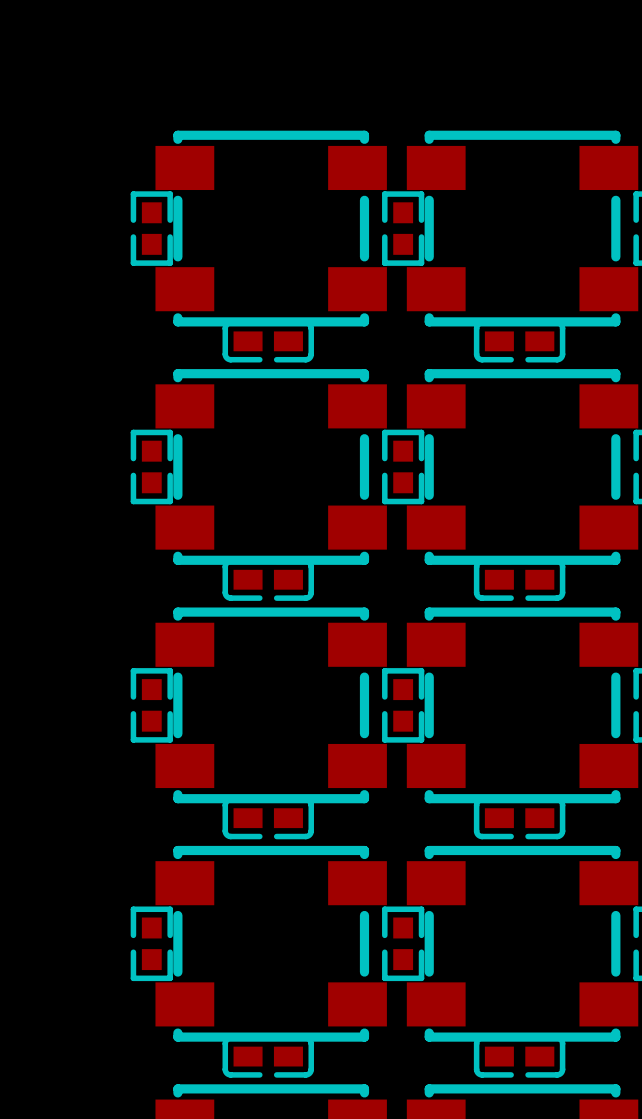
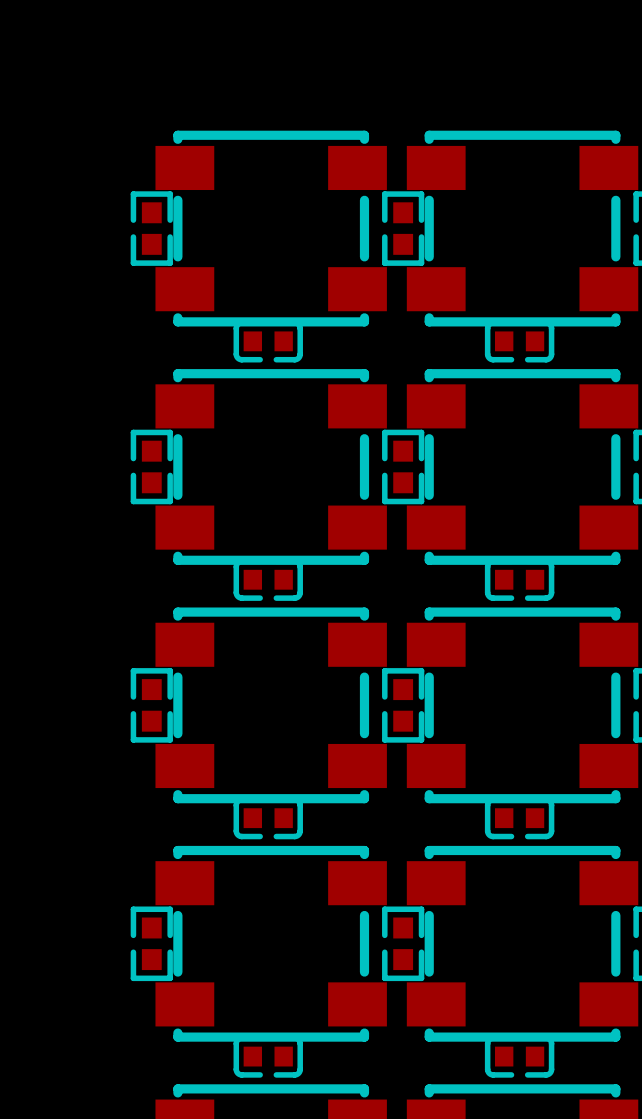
part footprint: [222, 320, 314, 363] -> [233, 320, 303, 363]
part footprint: [473, 320, 566, 363] -> [484, 320, 555, 363]
part footprint: [222, 558, 314, 601] -> [233, 558, 303, 601]
part footprint: [473, 558, 566, 601] -> [484, 558, 555, 601]
part footprint: [222, 797, 314, 840] -> [233, 797, 303, 840]
part footprint: [473, 797, 566, 840] -> [484, 797, 555, 840]
part footprint: [222, 1035, 314, 1078] -> [233, 1035, 303, 1078]
part footprint: [473, 1035, 566, 1078] -> [484, 1035, 555, 1078]

